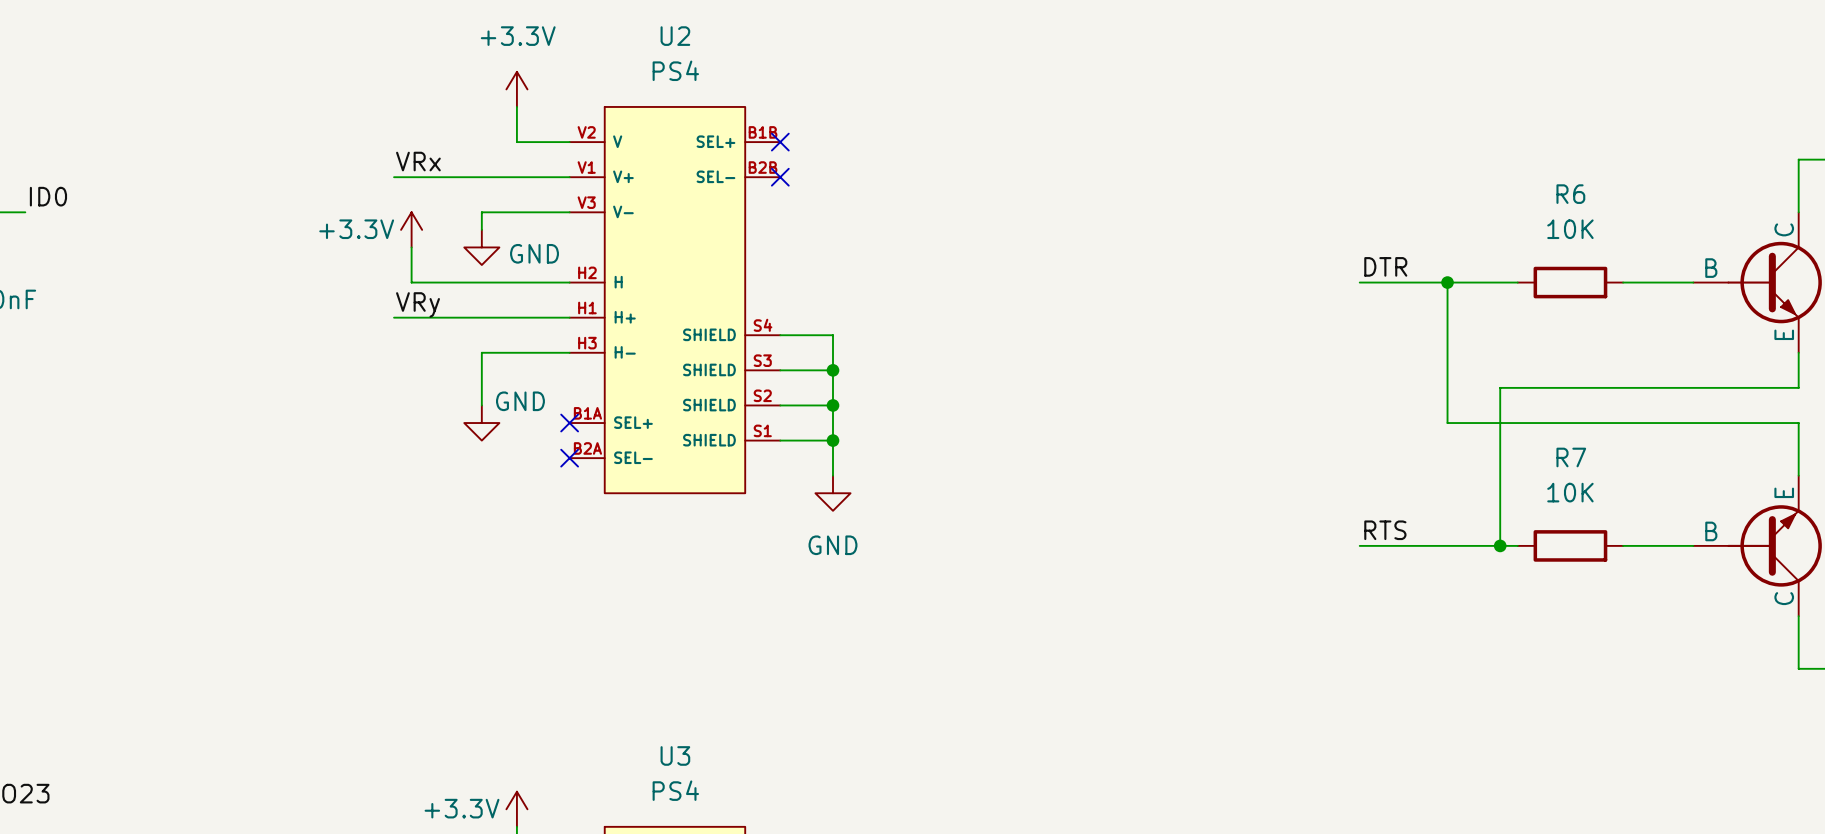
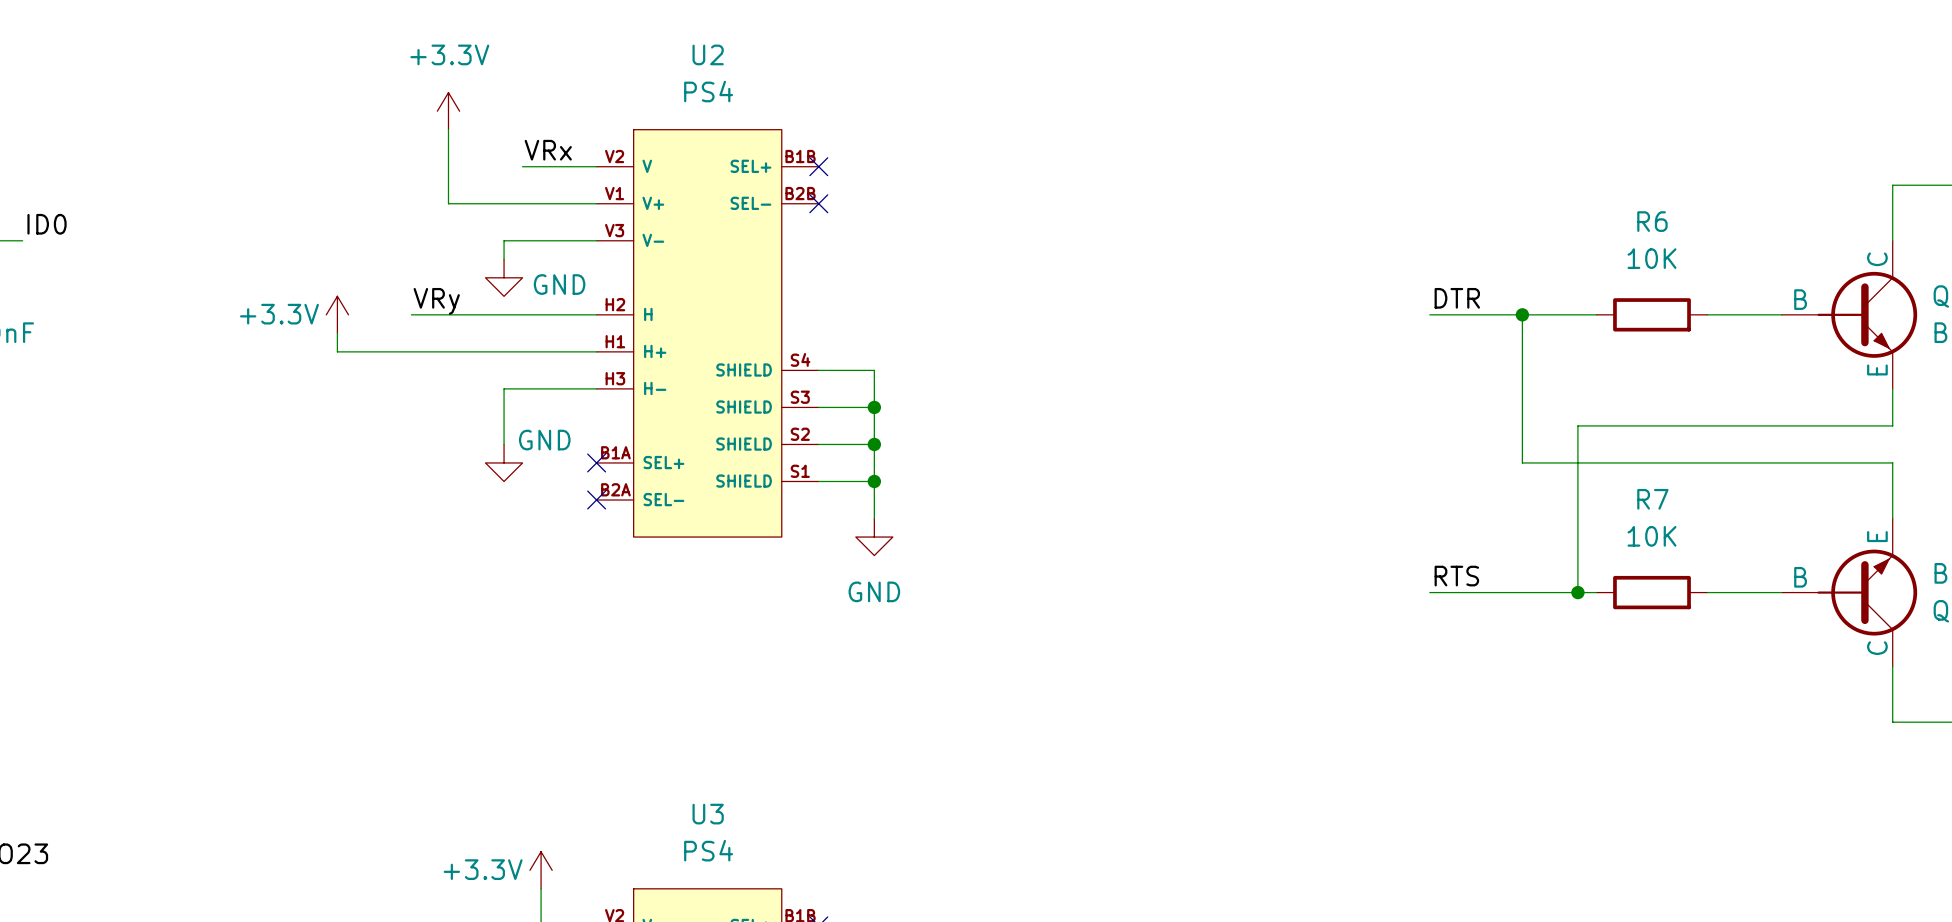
power symbol: none -> +3.3V (448, 111)
power symbol: +3.3V (516, 89) -> none
wire: (516, 106) (516, 142) -> (522, 166) (541, 166)
label position: VRx (418, 161) -> VRx (548, 150)
wire: (394, 177) (429, 177) -> (448, 129) (448, 203)
power symbol: +3.3V (411, 229) -> none
wire: (411, 247) (411, 282) -> (411, 314) (429, 314)
power symbol: none -> +3.3V (337, 314)
wire: none -> (337, 333) (337, 351) (411, 351)
label position: VRy (418, 304) -> VRy (436, 301)

